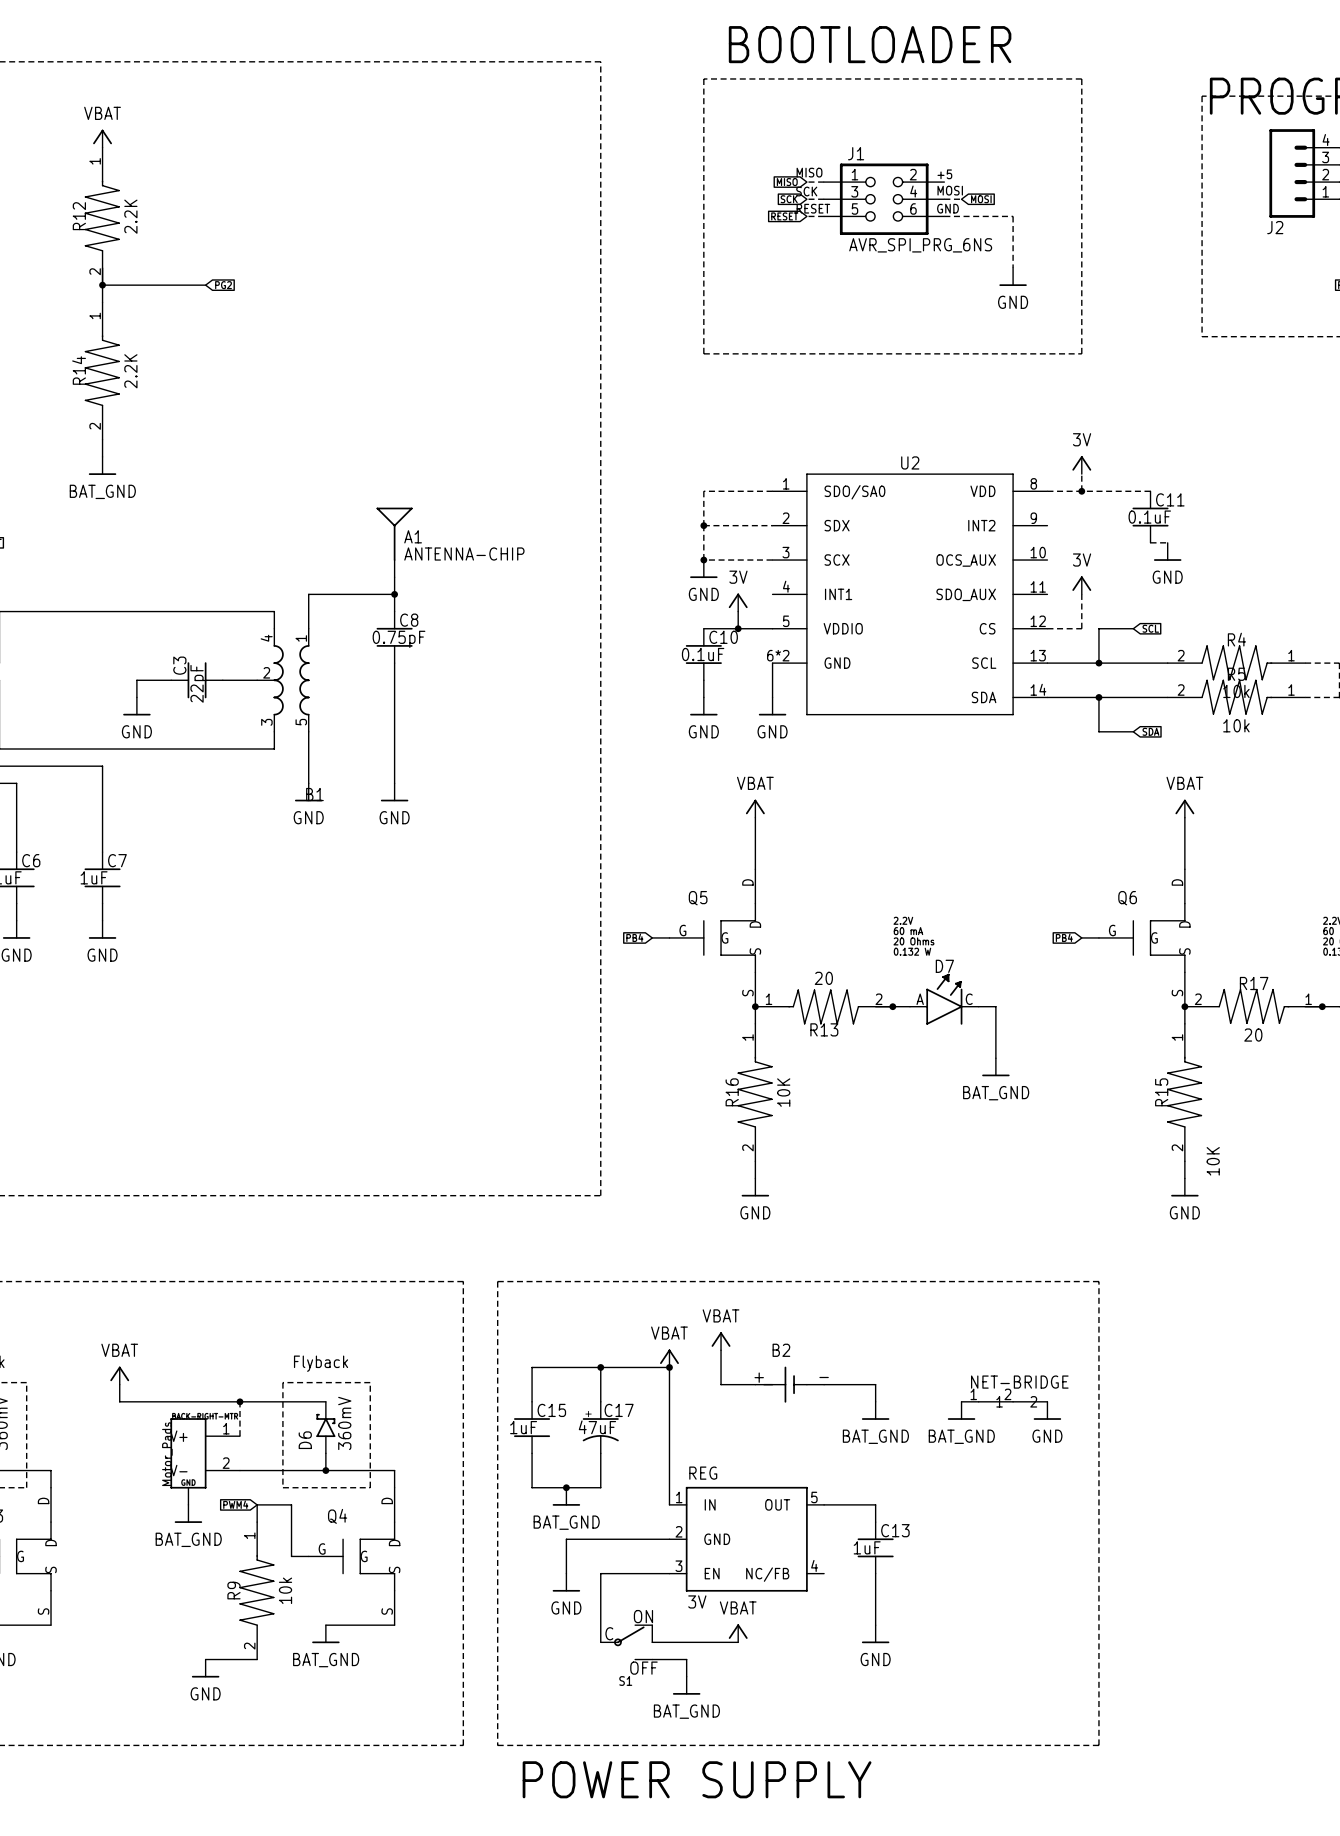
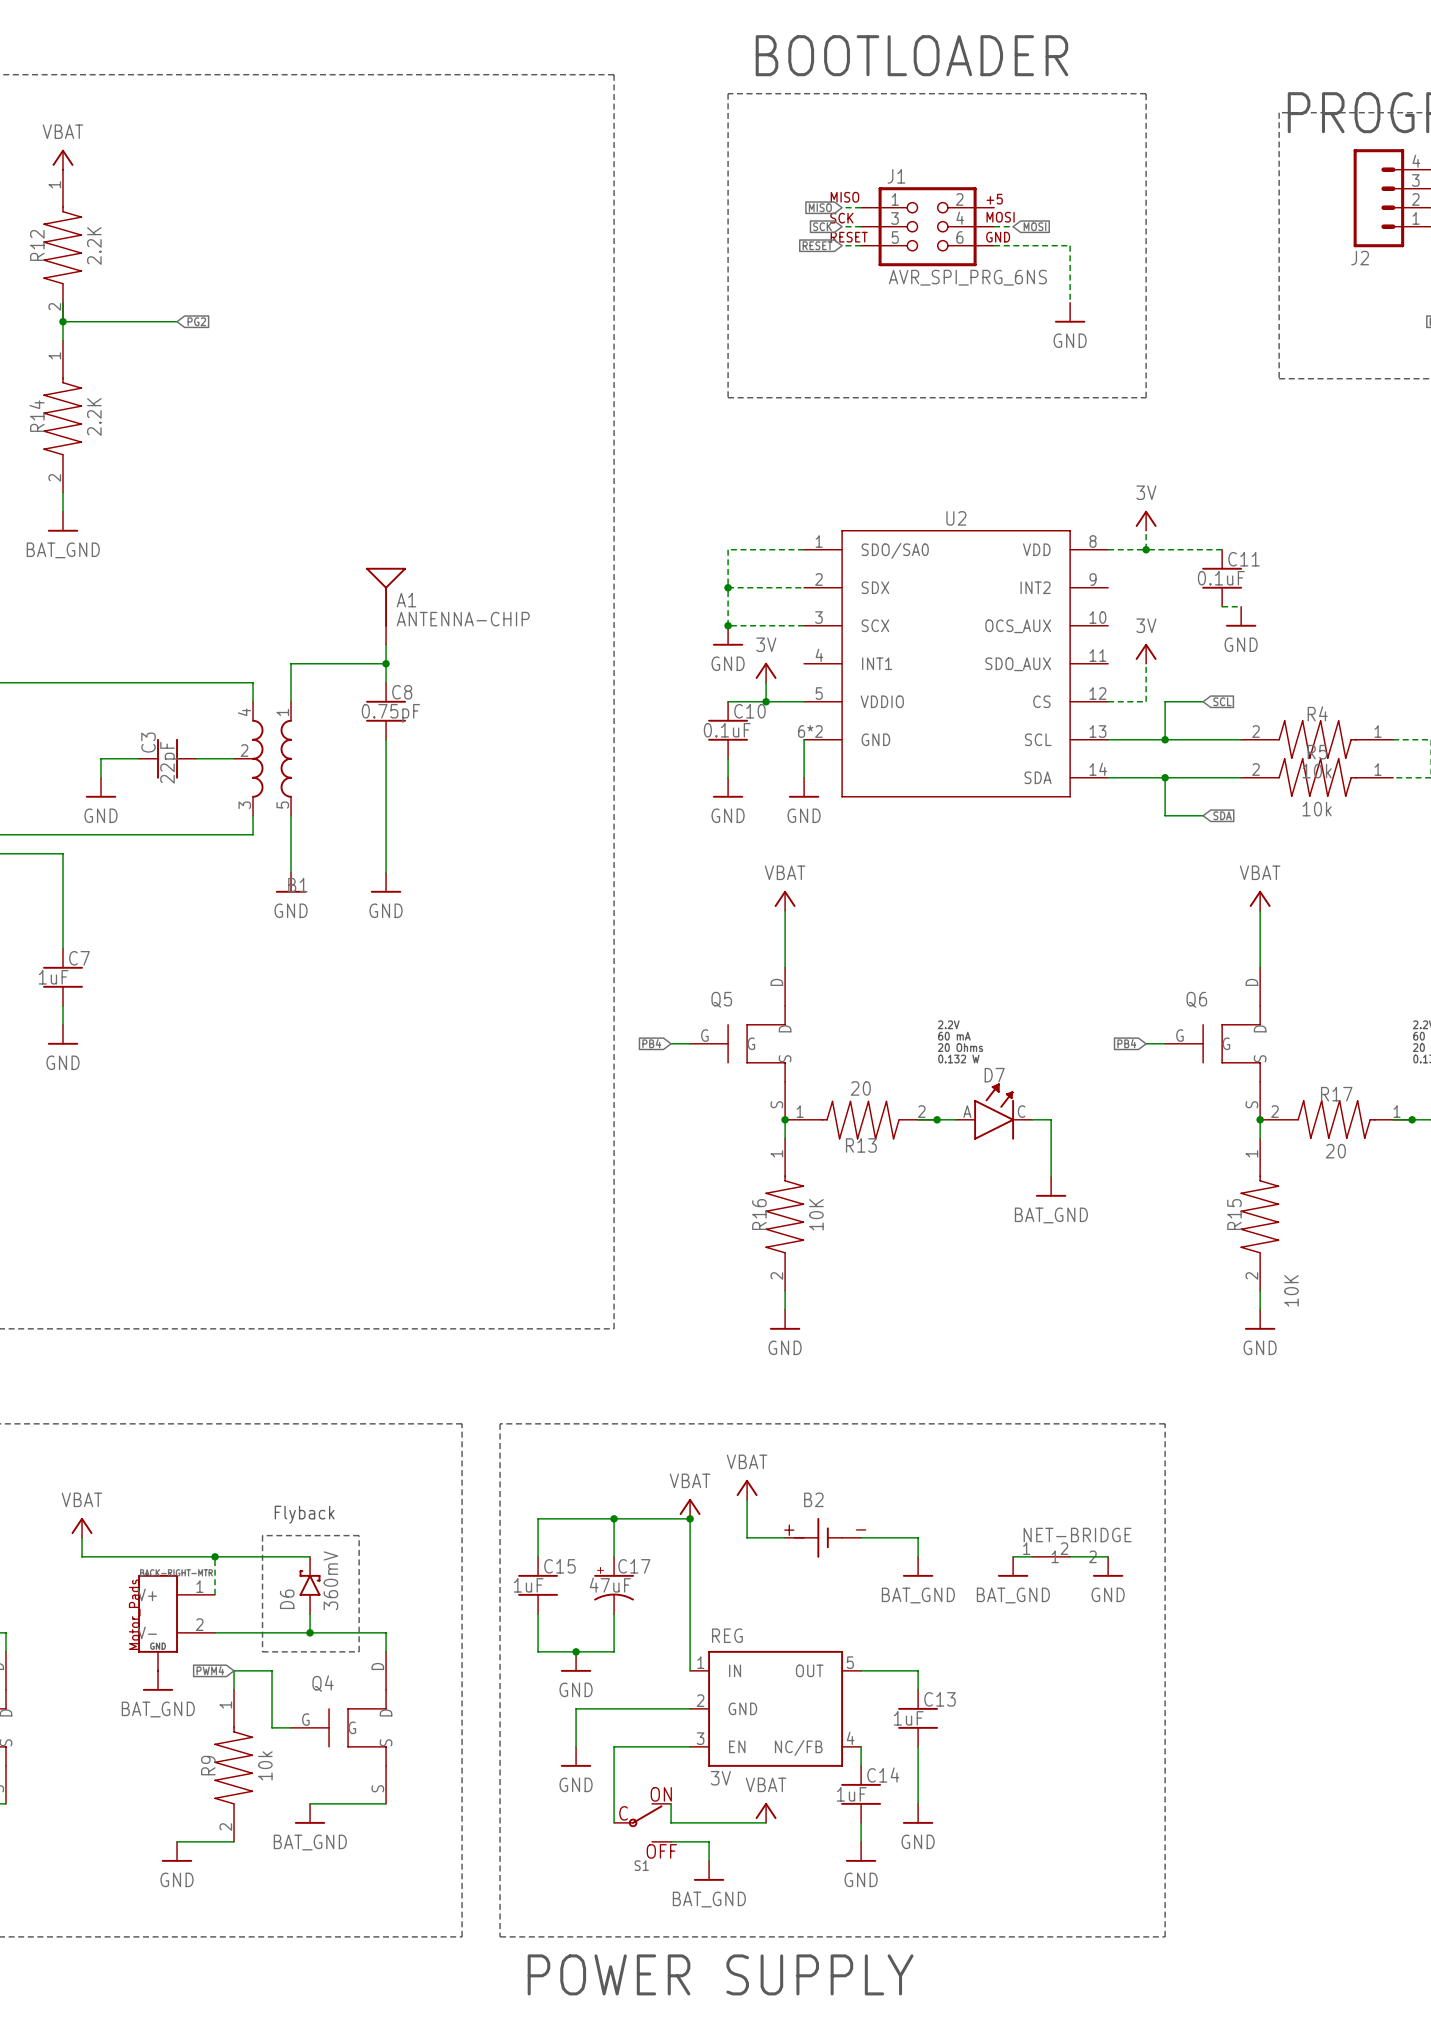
power symbol: BAT_GND (566, 1496) -> GND (576, 1661)
wire: none -> (861, 1746) (861, 1765)
C14: none -> 1uF (861, 1794)
wire: none -> (861, 1822) (861, 1841)
power symbol: none -> GND (861, 1851)

